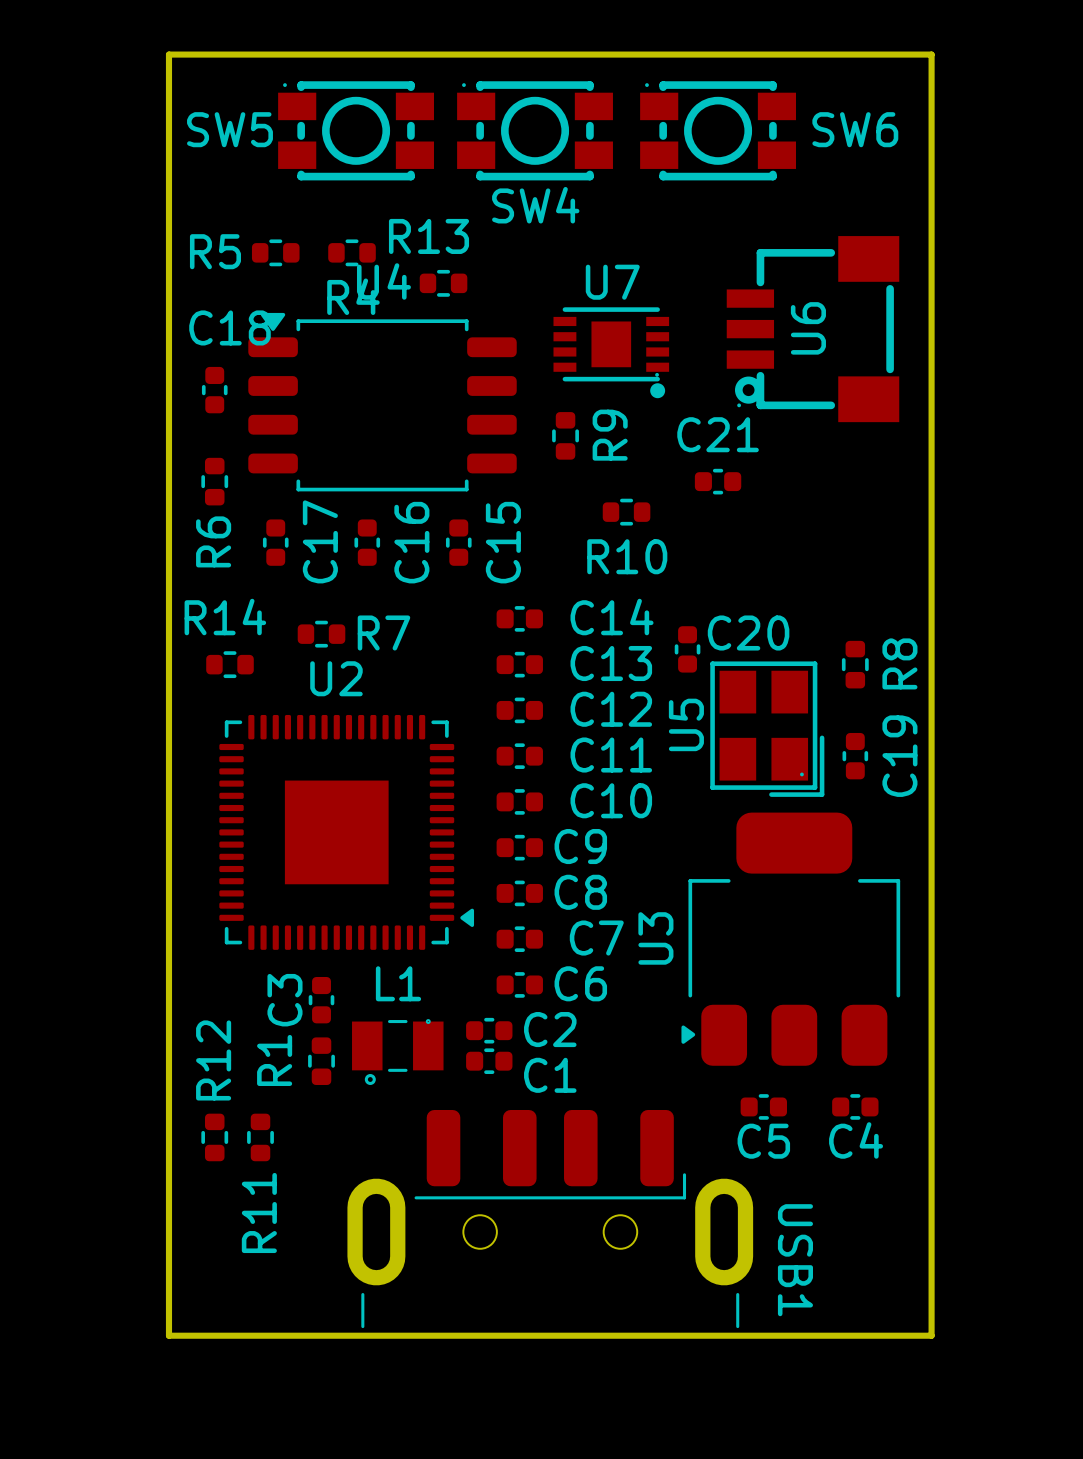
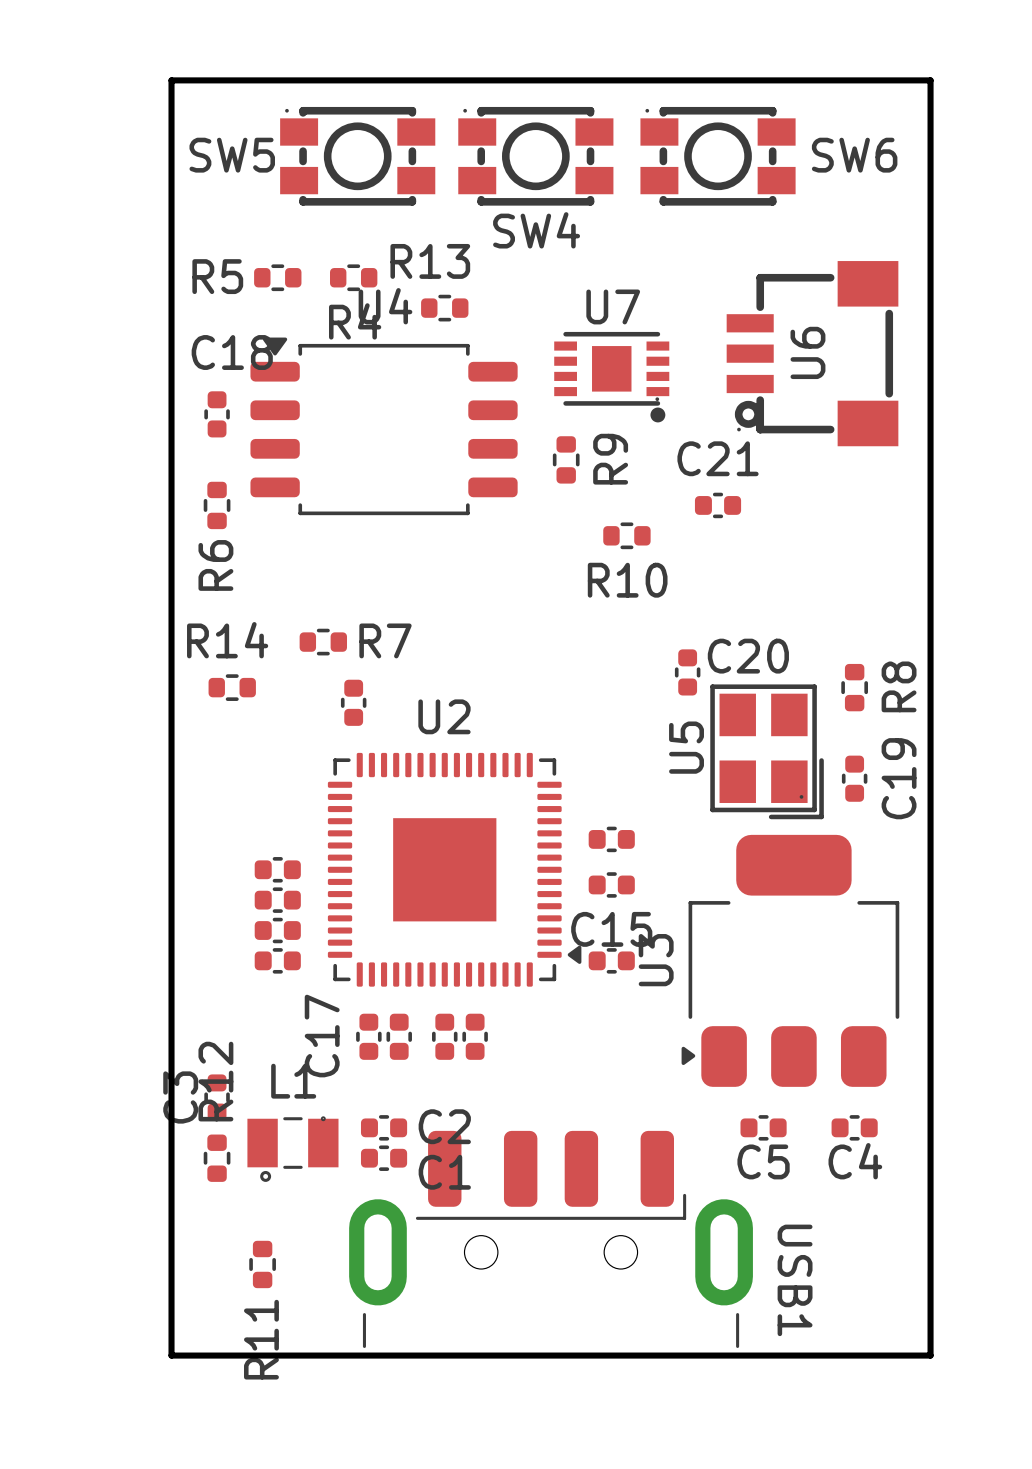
C17 name position: C17 (320, 541) -> C17 (322, 1036)
C17 position: (275, 542) -> (368, 1036)
C16: (367, 542) -> none
C15 rotation: 0° (458, 542) -> 90° clockwise (611, 884)
C15 position: (458, 542) -> (611, 884)
C14: (519, 618) -> none
R7 position: (321, 634) -> (323, 642)
C13: (519, 664) -> none
part: none -> (353, 702)
C12: (519, 710) -> none
C11: (519, 756) -> none
C10: (519, 801) -> none
part: none -> (611, 839)
U2 position: (346, 832) -> (454, 869)
part: none -> (277, 869)
C9: (519, 847) -> none
part: none -> (277, 900)
C8: (519, 893) -> none
part: none -> (277, 930)
part: none -> (277, 960)
C7: (519, 939) -> none
part: none -> (611, 960)
C6: (519, 984) -> none
C3 position: (321, 1000) -> (217, 1097)
part: none -> (399, 1036)
part: none -> (444, 1036)
part: none -> (475, 1036)
C2 position: (489, 1030) -> (384, 1127)
L1 position: (397, 1052) -> (292, 1149)
R1: (321, 1061) -> none
C1 position: (489, 1061) -> (384, 1158)
R11 position: (260, 1137) -> (262, 1264)

